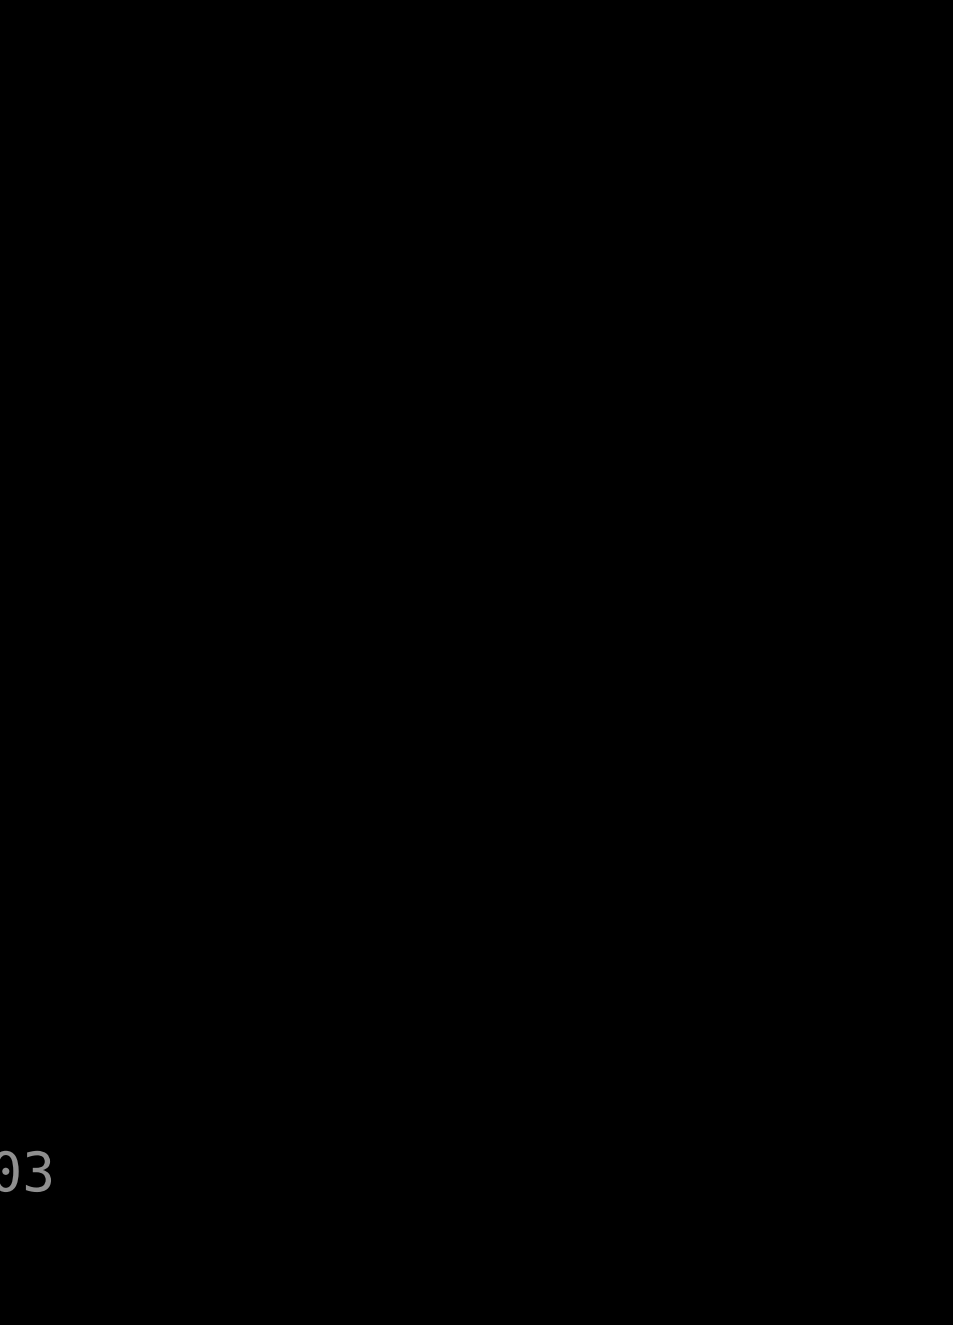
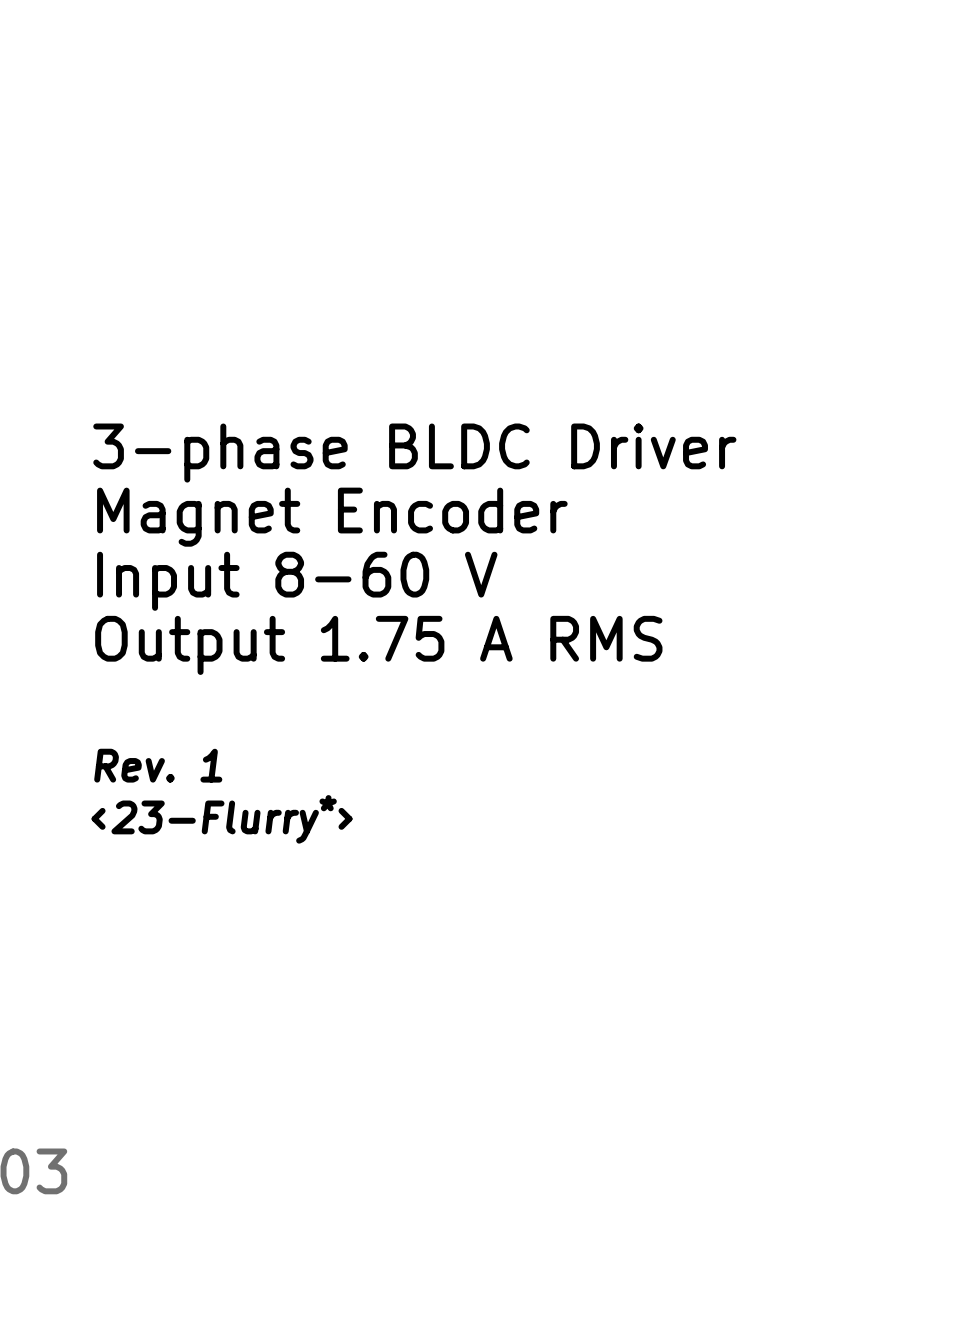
text: none -> 3-phase BLDC Driver (414, 453)
text: none -> Magnet Encoder (332, 517)
text: none -> Input 8-60 V (297, 581)
text: none -> Output 1.75 A RMS (378, 645)
text: none -> Rev. 1 (158, 765)
text: none -> * (328, 803)
line: none -> (102, 810) (94, 818) (102, 826)
line: none -> (341, 810) (349, 818) (341, 826)
text: none -> 23-Flurry (215, 822)

